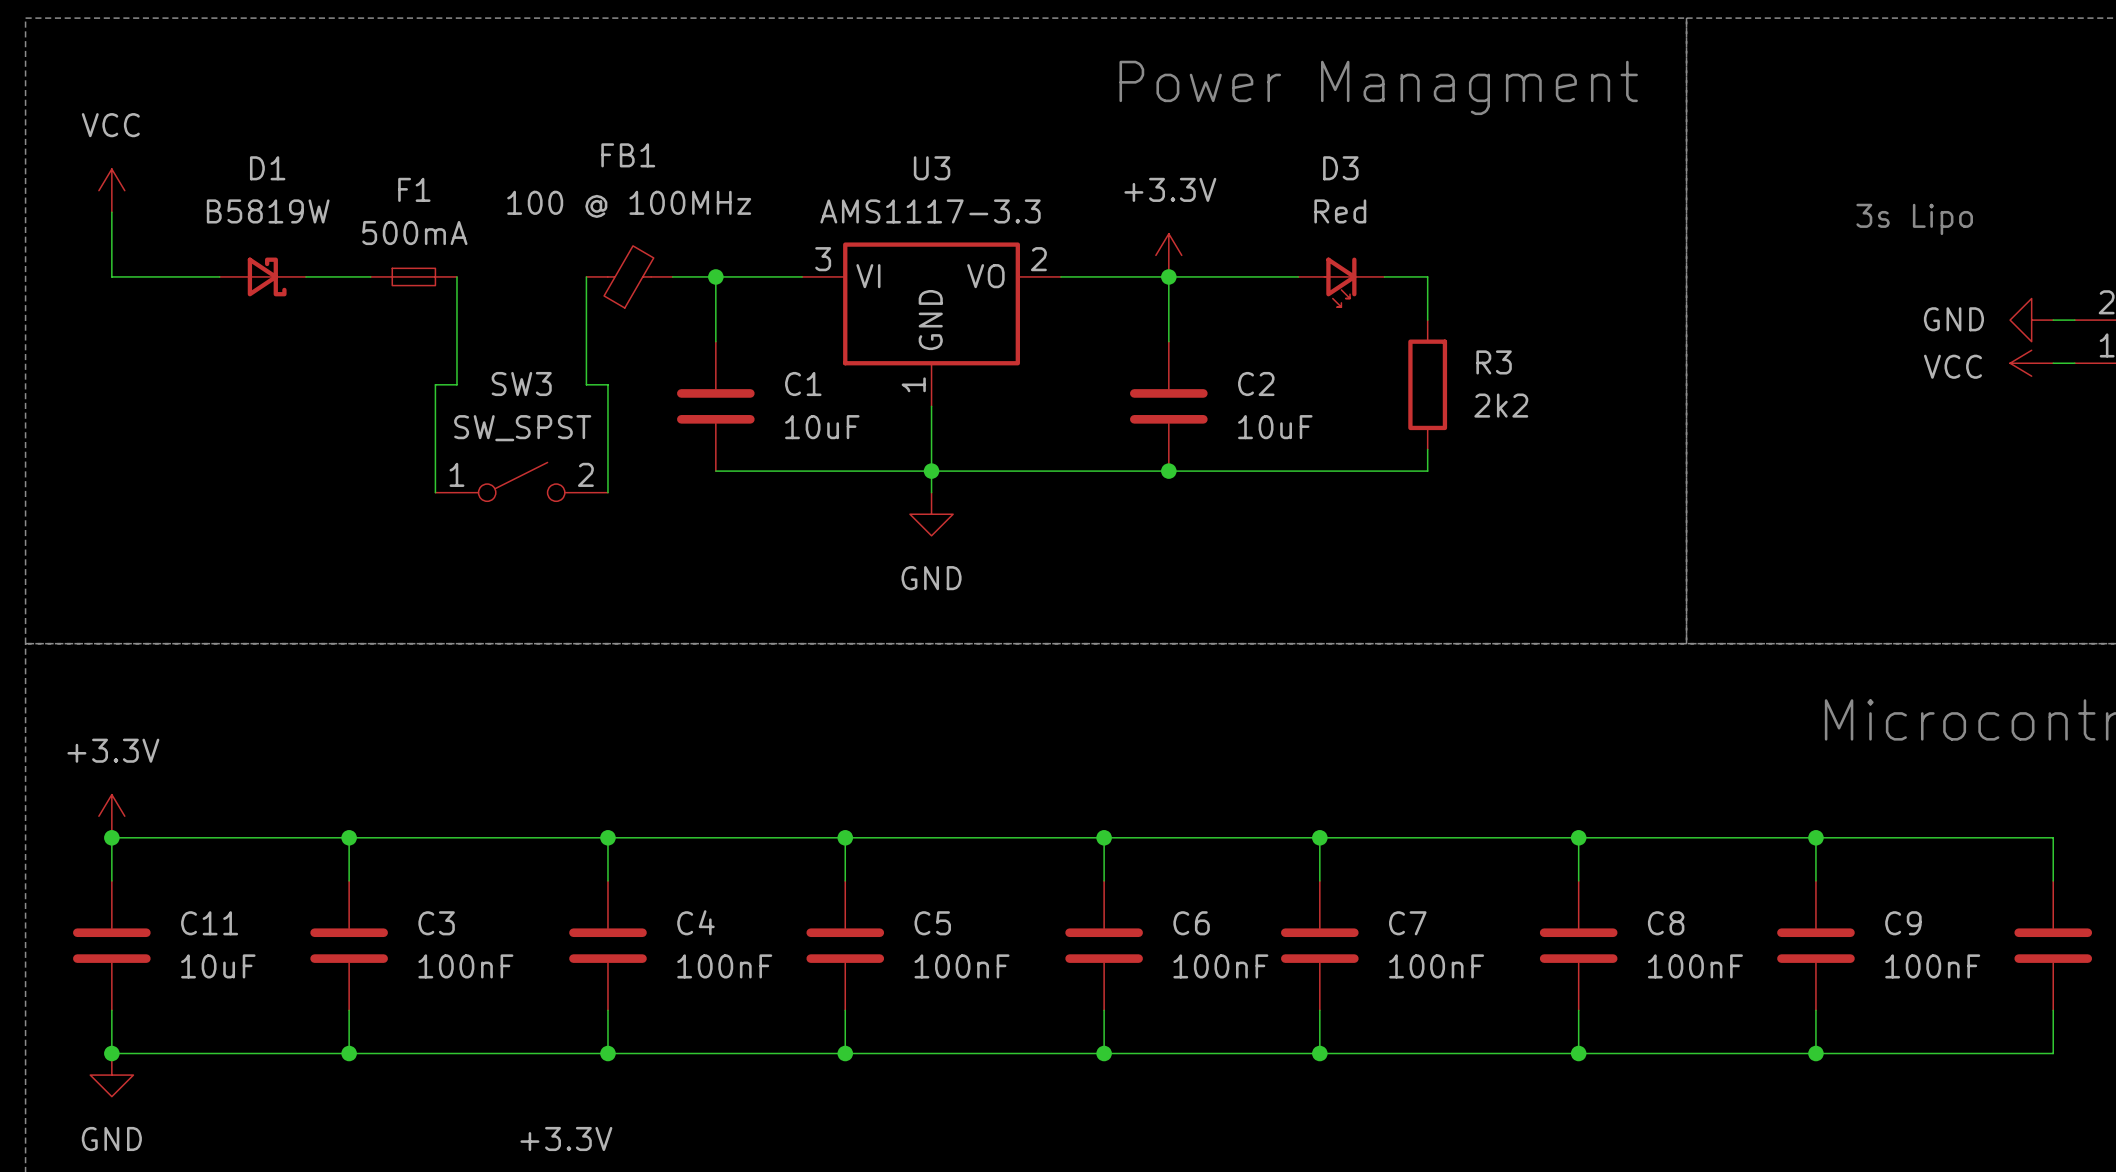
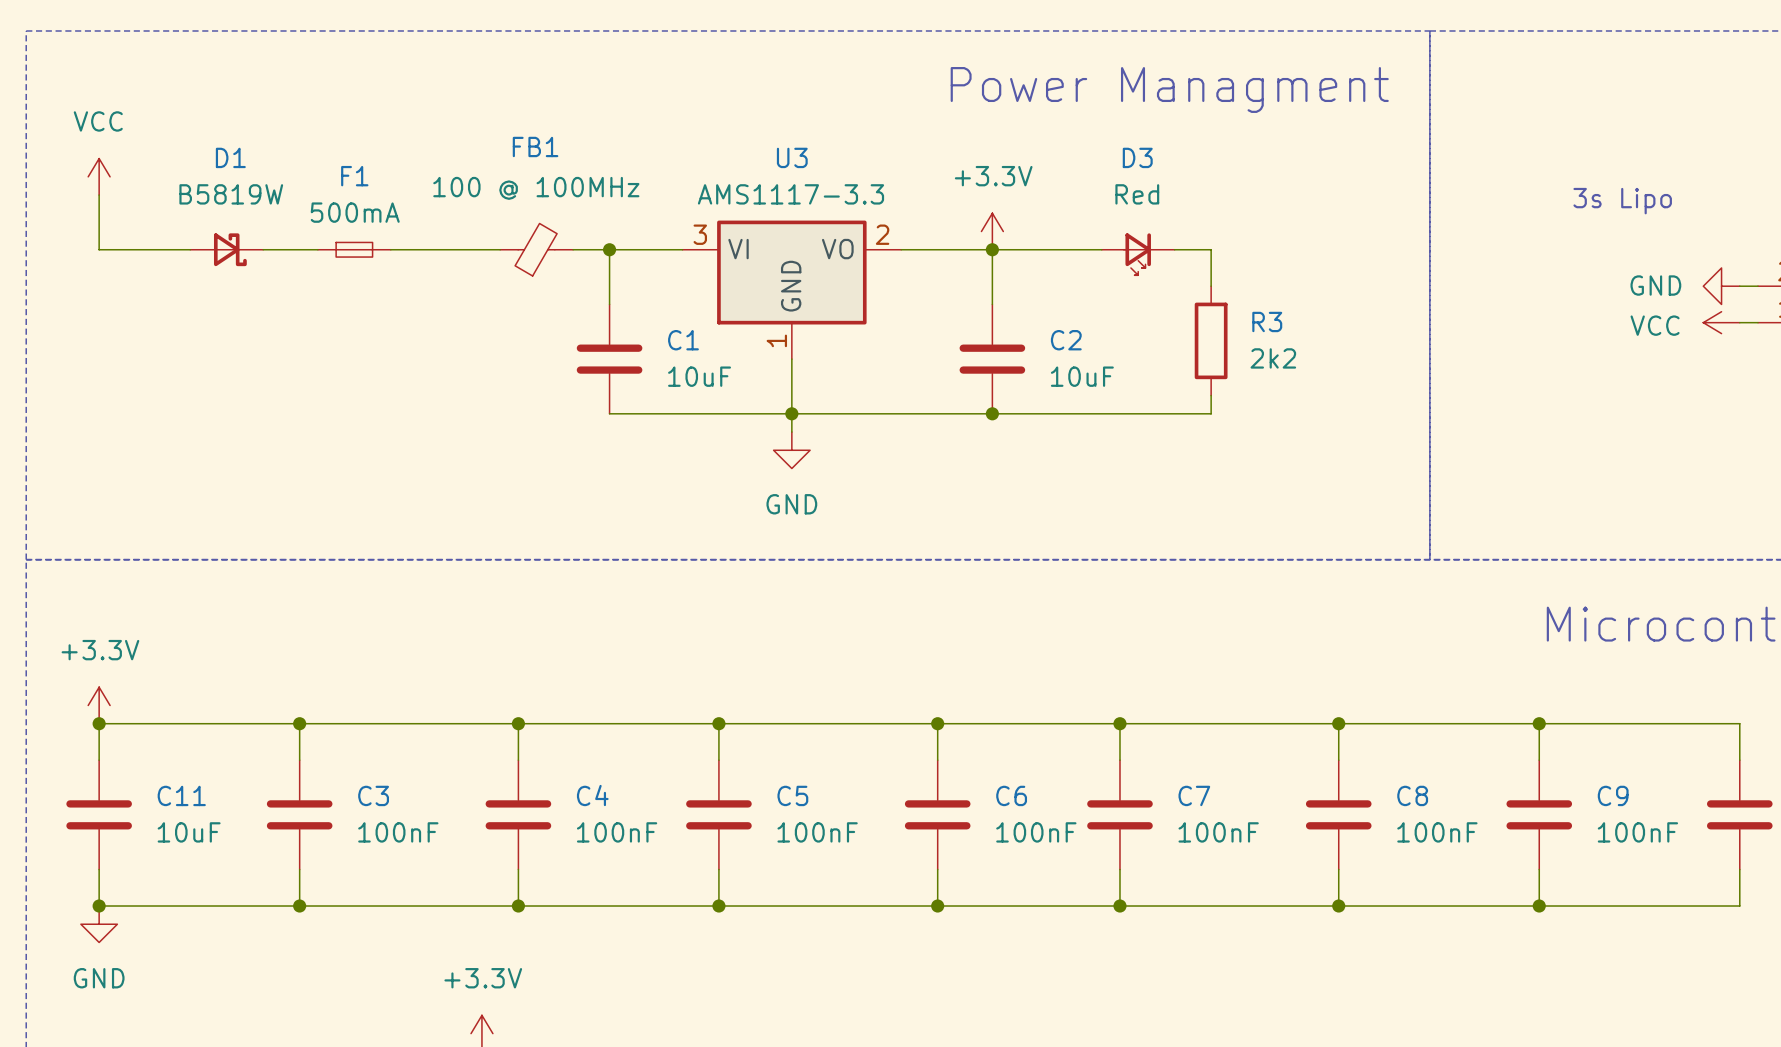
wire: (456, 276) (456, 384) (435, 384) (435, 492) -> (390, 249) (500, 249)
wire: (586, 276) (586, 384) (607, 384) (607, 492) -> none
SW3: SW_SPST (521, 481) -> none

